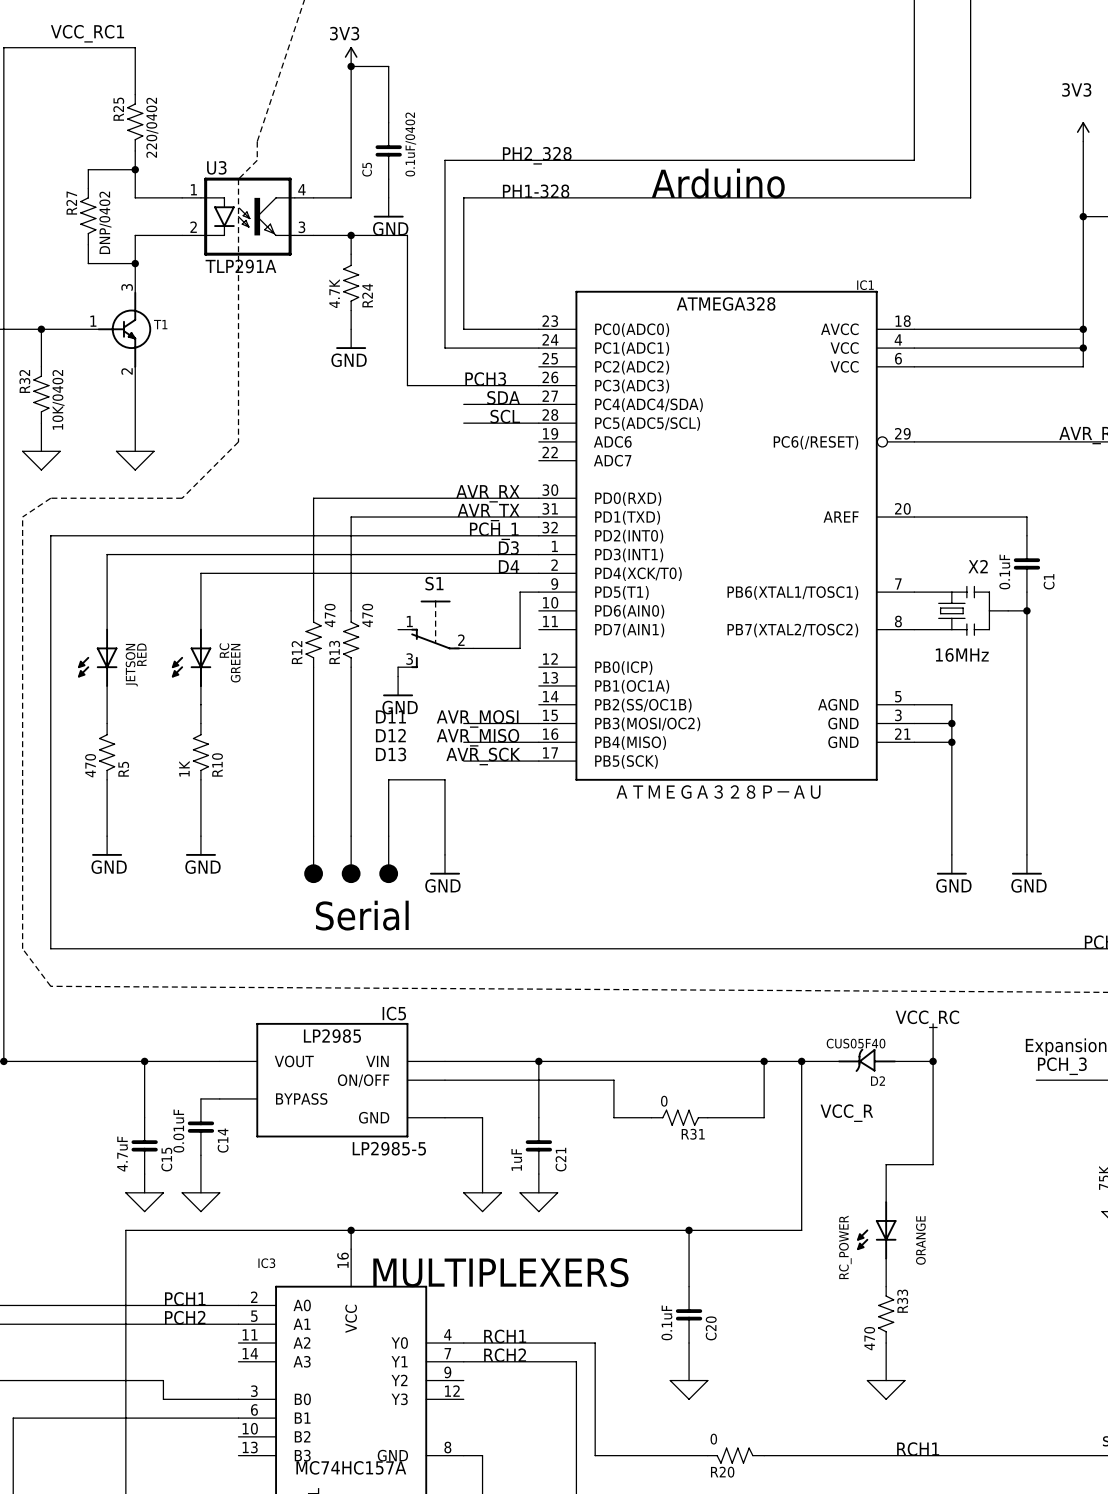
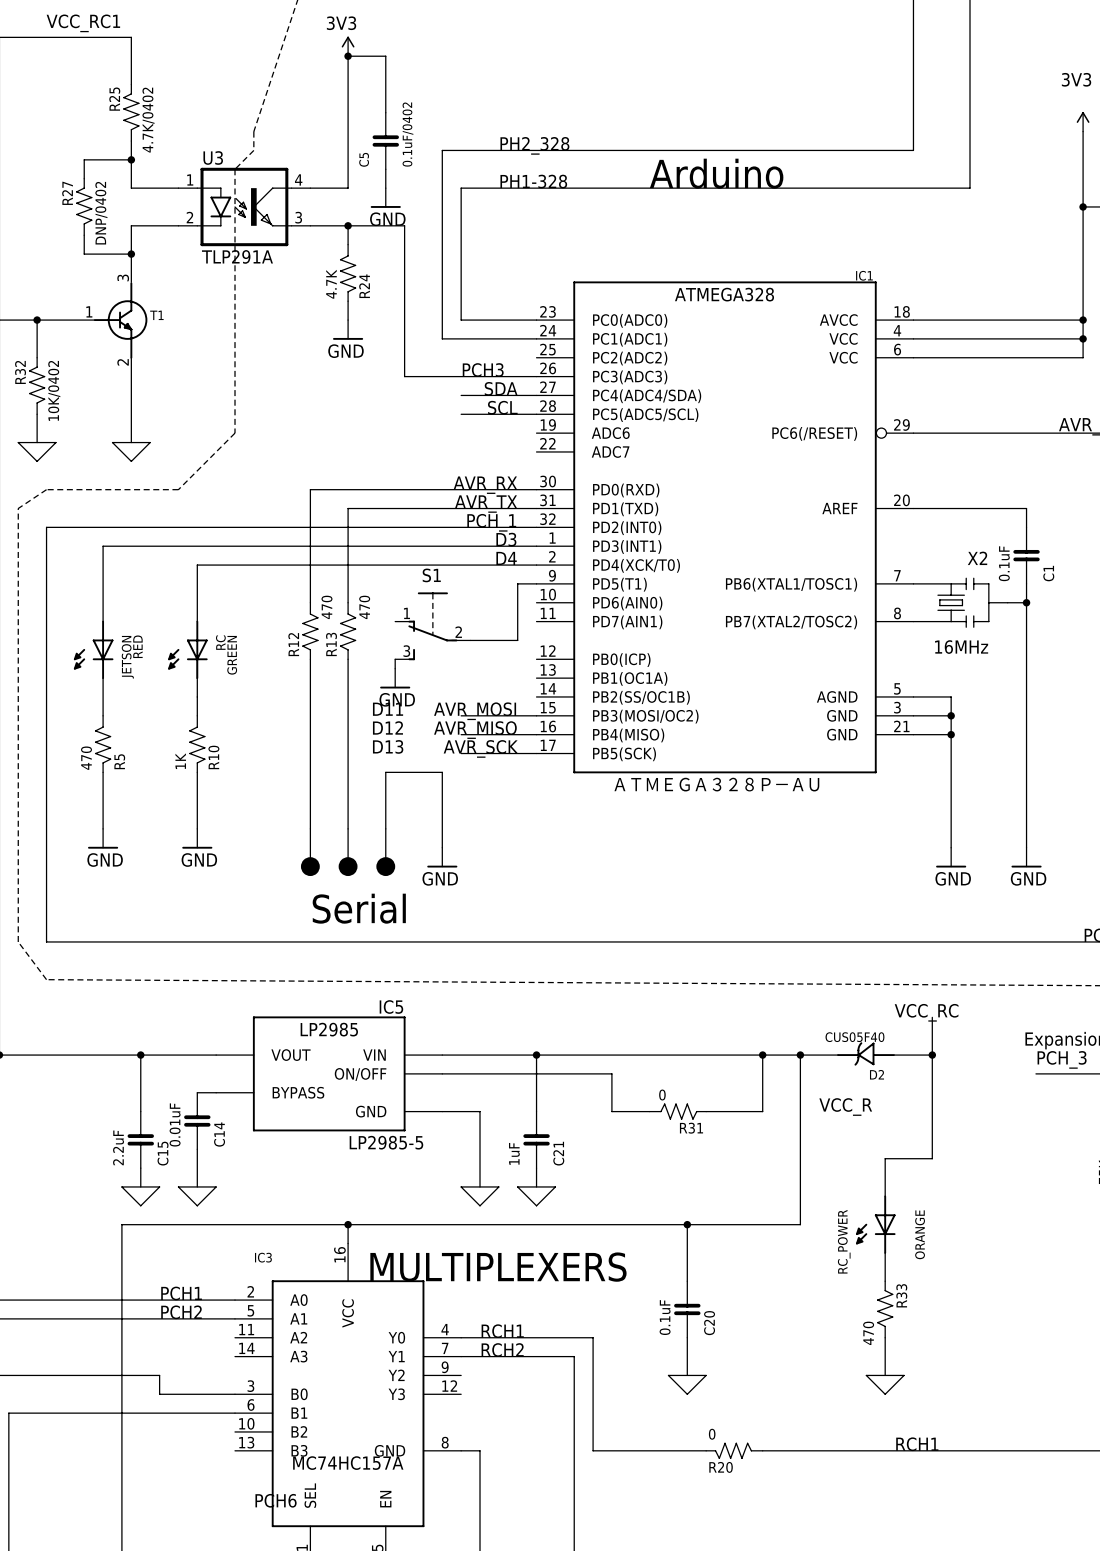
R25 value: 220/0402 (152, 127) -> 4.7K/0402 (148, 120)
C15 value: 4.7uF (122, 1154) -> 2.2uF (118, 1147)

